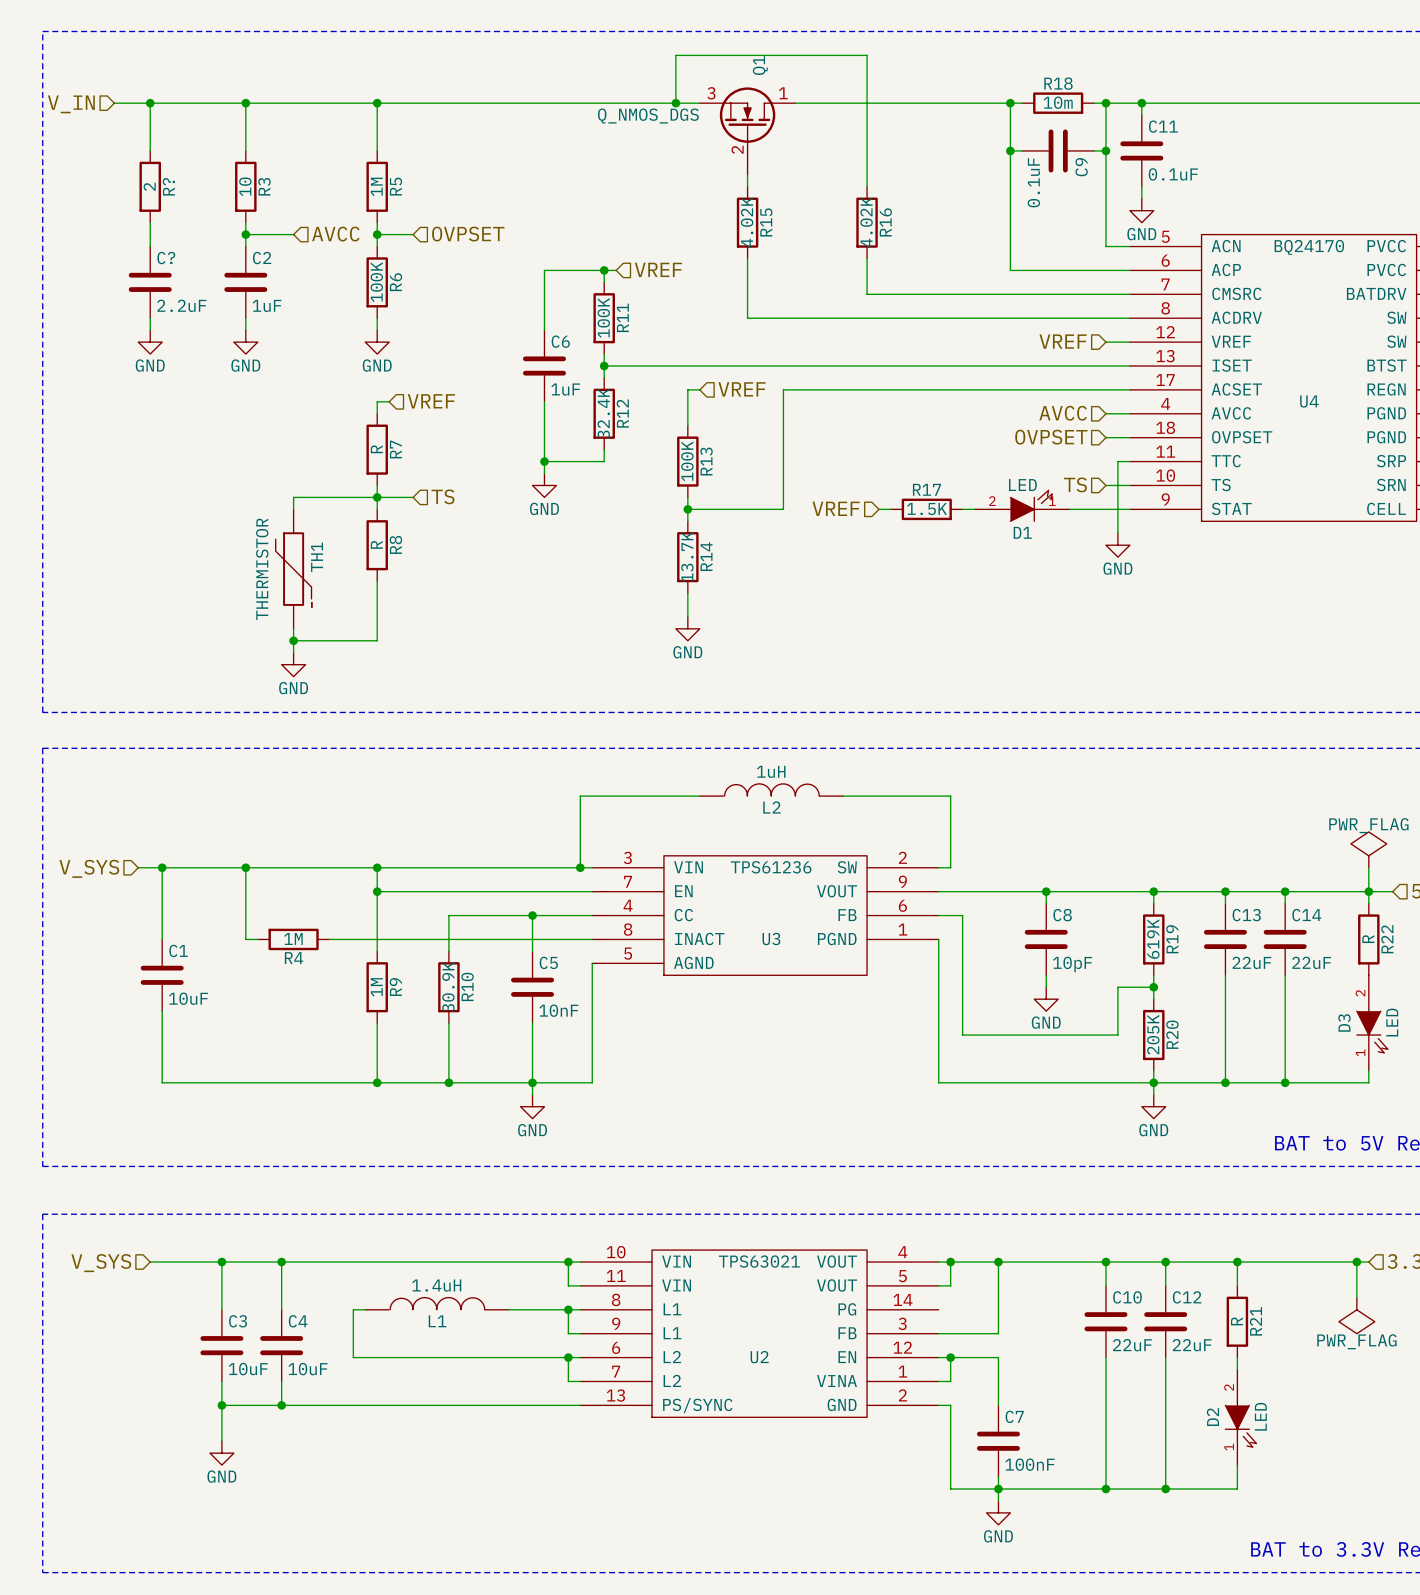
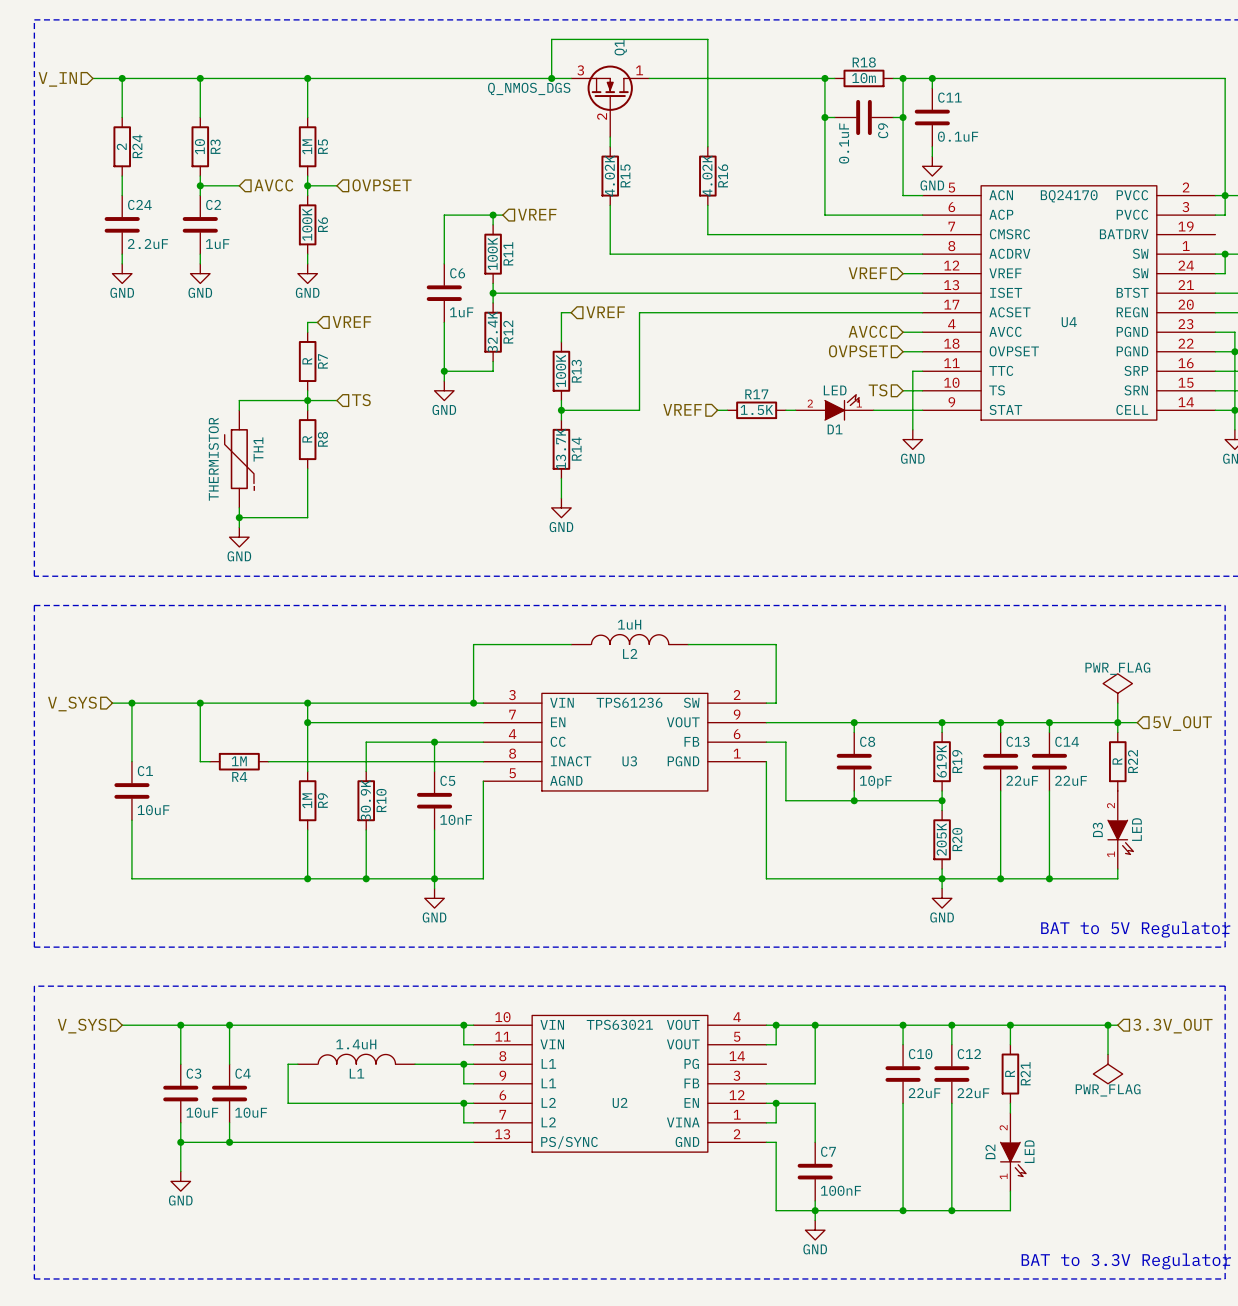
R? name: R? (168, 186) -> R24 (137, 146)
C? name: C? (166, 258) -> C24 (139, 204)
wire: (962, 987) (962, 1035) (1117, 1035) (1117, 987) -> (785, 800) (912, 800)
junction: none -> (854, 800)
power symbol: GND (1046, 999) -> none

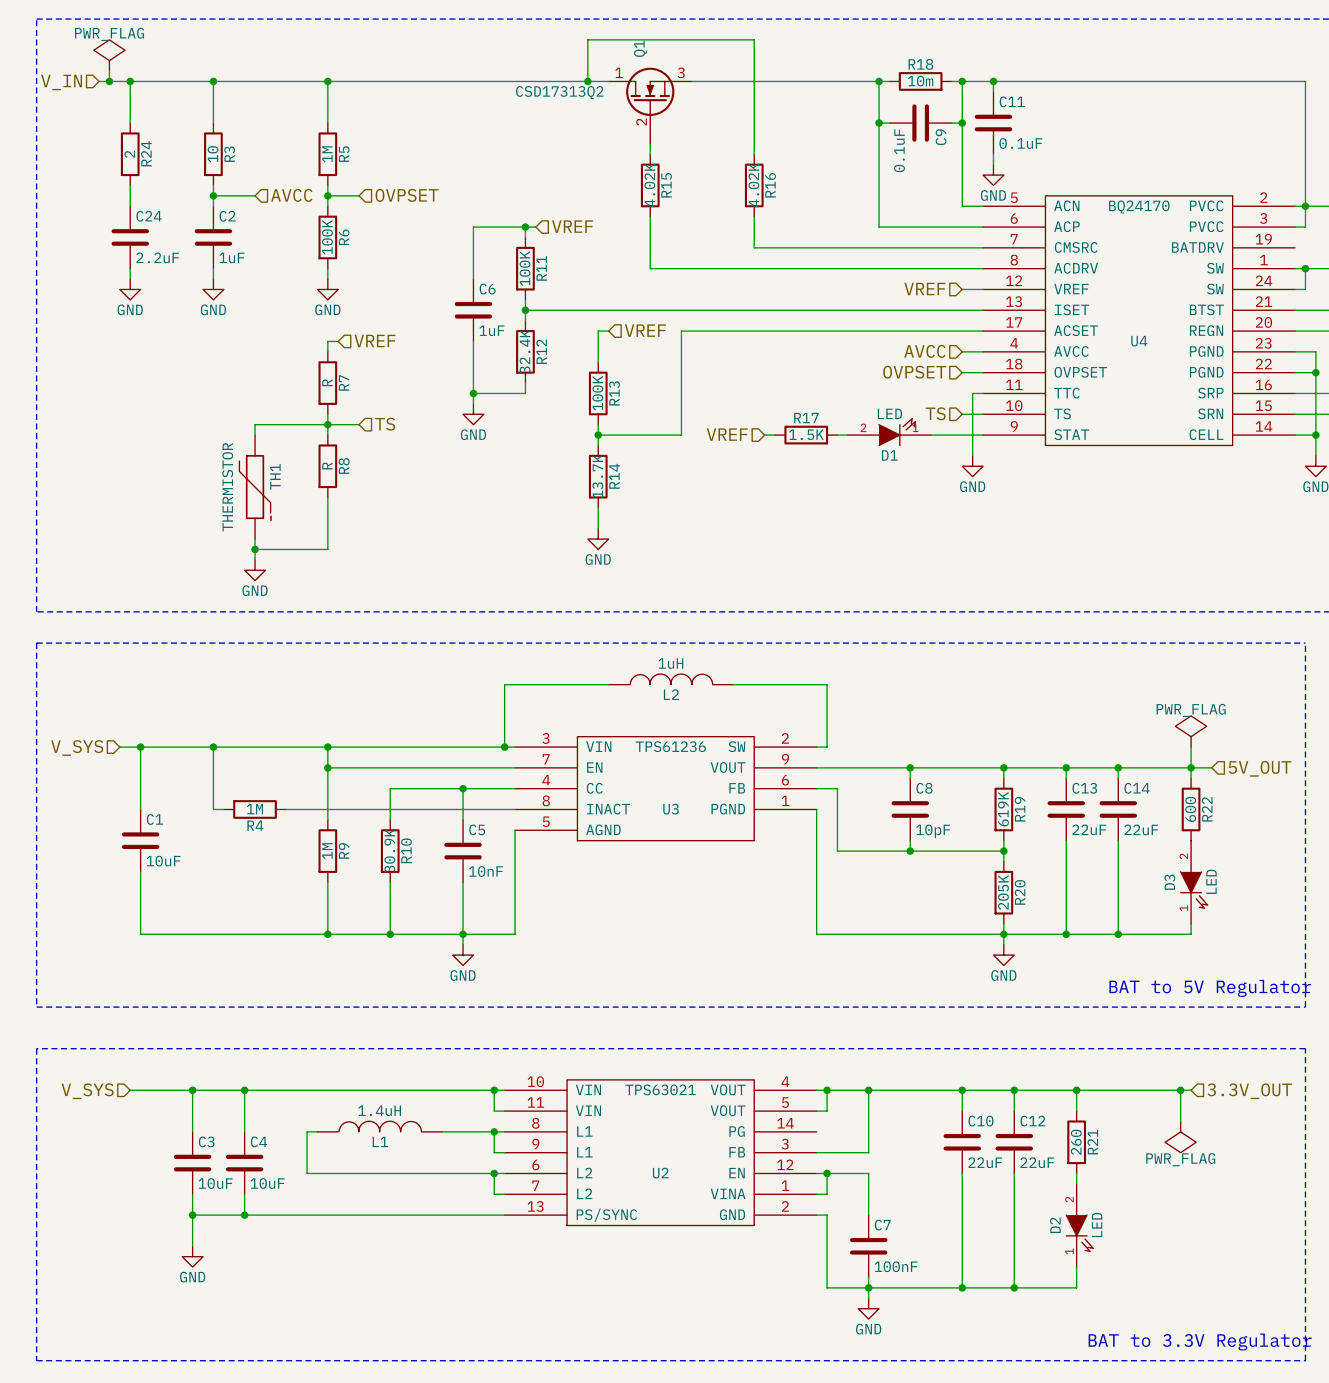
power symbol: none -> PWR_FLAG (109, 55)
wire: none -> (109, 71) (109, 81)
junction: none -> (109, 81)
Q1 value: Q_NMOS_DGS (529, 88) -> CSD17313Q2 (559, 92)
Q1 flip: as is (610, 88) -> left-right (650, 91)
R22 value: R (1117, 761) -> 600 (1190, 809)
R21 value: R (1010, 1073) -> 260 (1076, 1142)

